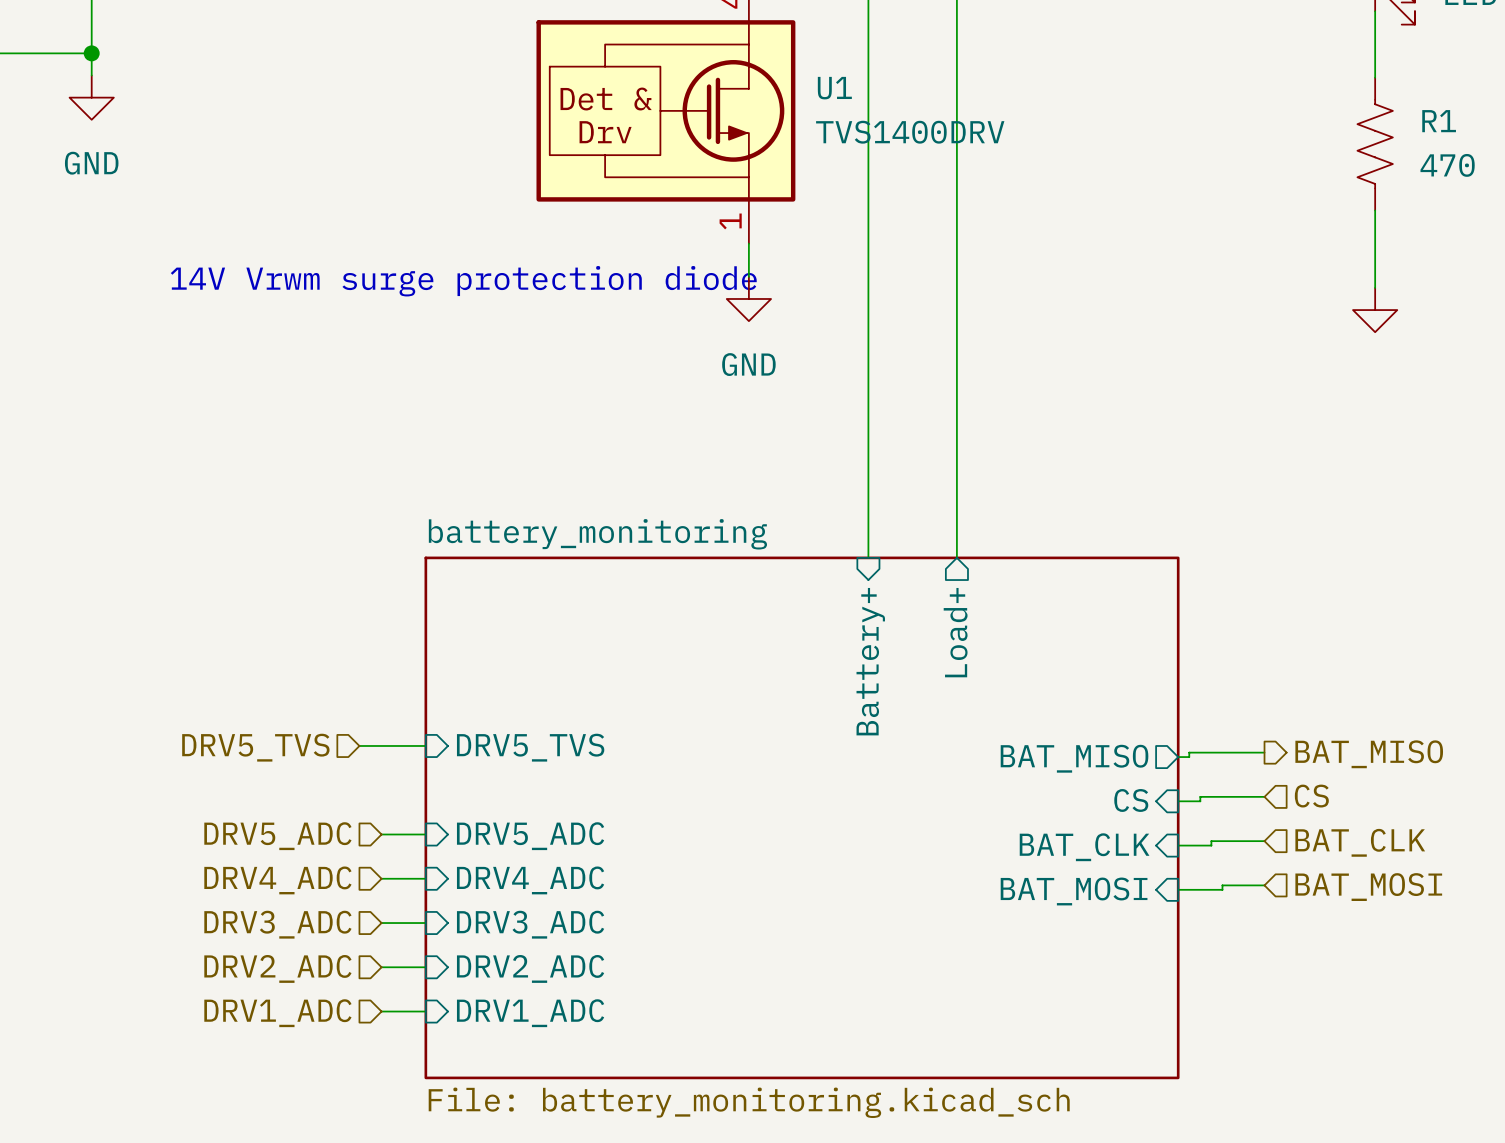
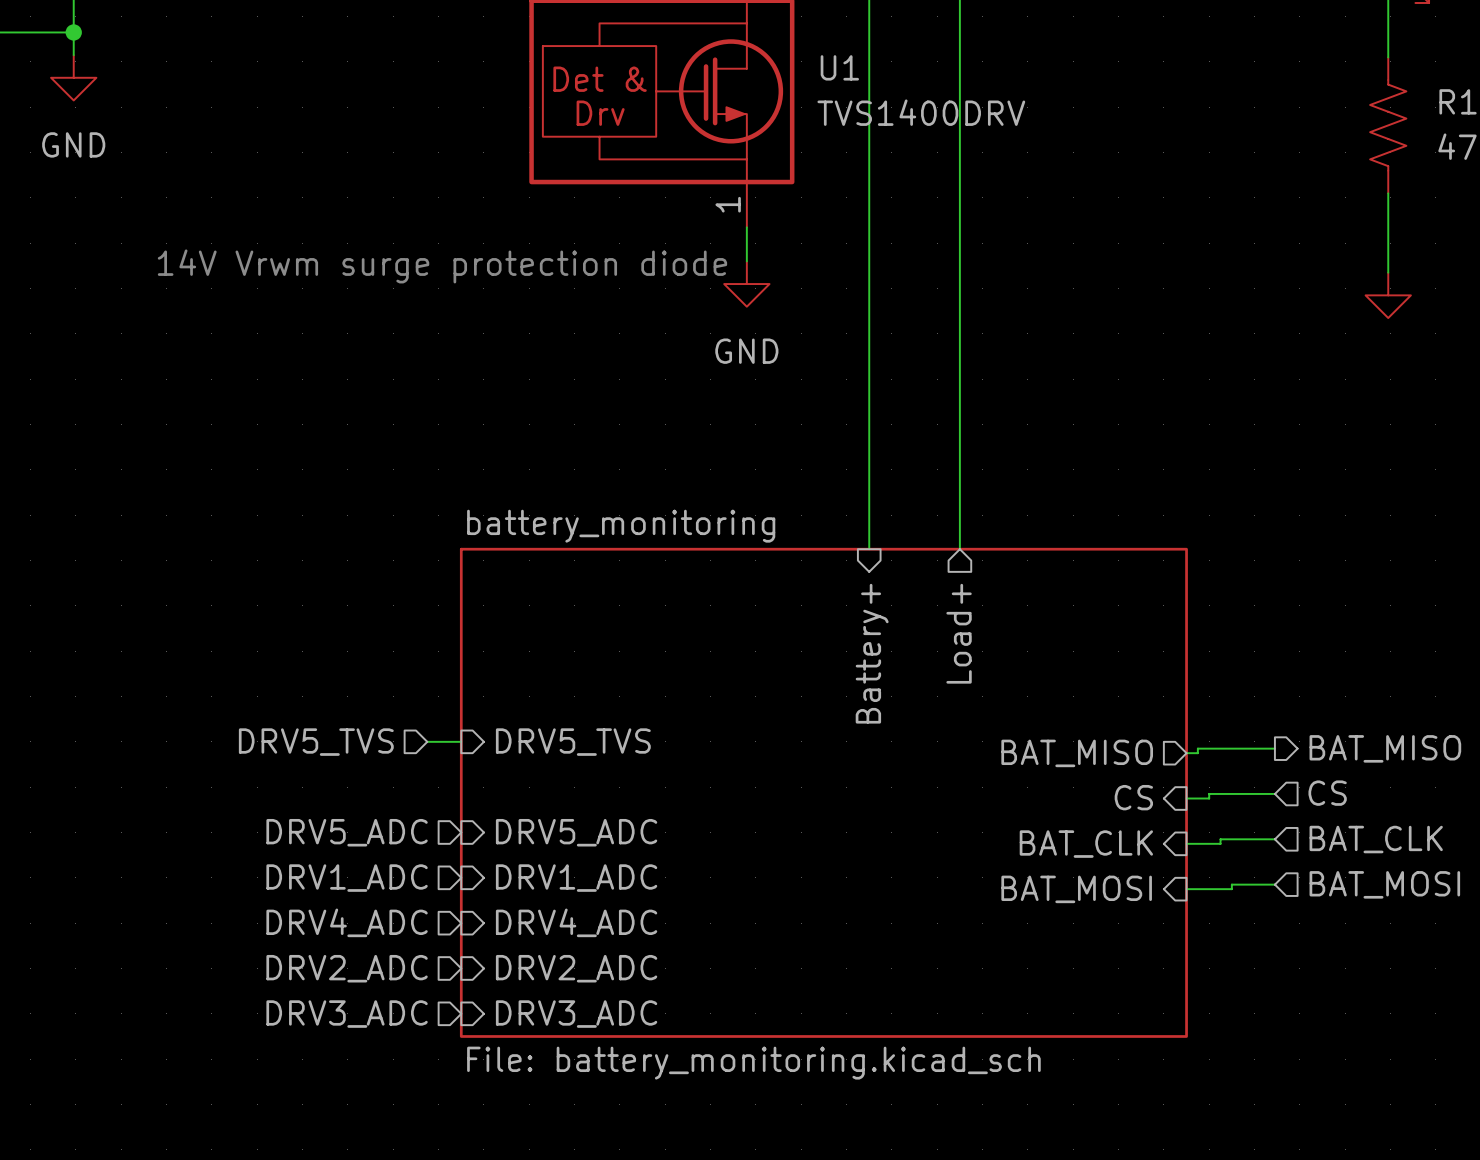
wire: (359, 745) (425, 745) -> none
wire: none -> (427, 741) (461, 741)
hierarchical label position: DRV5_TVS (255, 747) -> DRV5_TVS (316, 742)
sheet pin position: DRV5_TVS (530, 747) -> DRV5_TVS (573, 742)
sheet battery_monitoring: none -> File: battery_monitoring.kicad_sch (823, 792)
sheet battery_monitoring: File: battery_monitoring.kicad_sch (802, 817) -> none
wire: (381, 834) (425, 834) -> none
hierarchical label position: DRV5_ADC (277, 836) -> DRV5_ADC (347, 832)
sheet pin position: DRV5_ADC (530, 836) -> DRV5_ADC (576, 832)
wire: (381, 878) (425, 878) -> none
hierarchical label position: DRV4_ADC (277, 880) -> DRV4_ADC (347, 922)
sheet pin position: DRV4_ADC (530, 880) -> DRV4_ADC (576, 922)
wire: (381, 923) (425, 923) -> none
hierarchical label position: DRV3_ADC (277, 924) -> DRV3_ADC (347, 1014)
sheet pin position: DRV3_ADC (530, 924) -> DRV3_ADC (576, 1014)
wire: (381, 967) (425, 967) -> none
hierarchical label position: DRV2_ADC (277, 968) -> DRV2_ADC (347, 968)
sheet pin position: DRV2_ADC (530, 968) -> DRV2_ADC (576, 968)
wire: (381, 1011) (425, 1011) -> none
hierarchical label position: DRV1_ADC (277, 1013) -> DRV1_ADC (347, 878)
sheet pin position: DRV1_ADC (530, 1013) -> DRV1_ADC (576, 878)

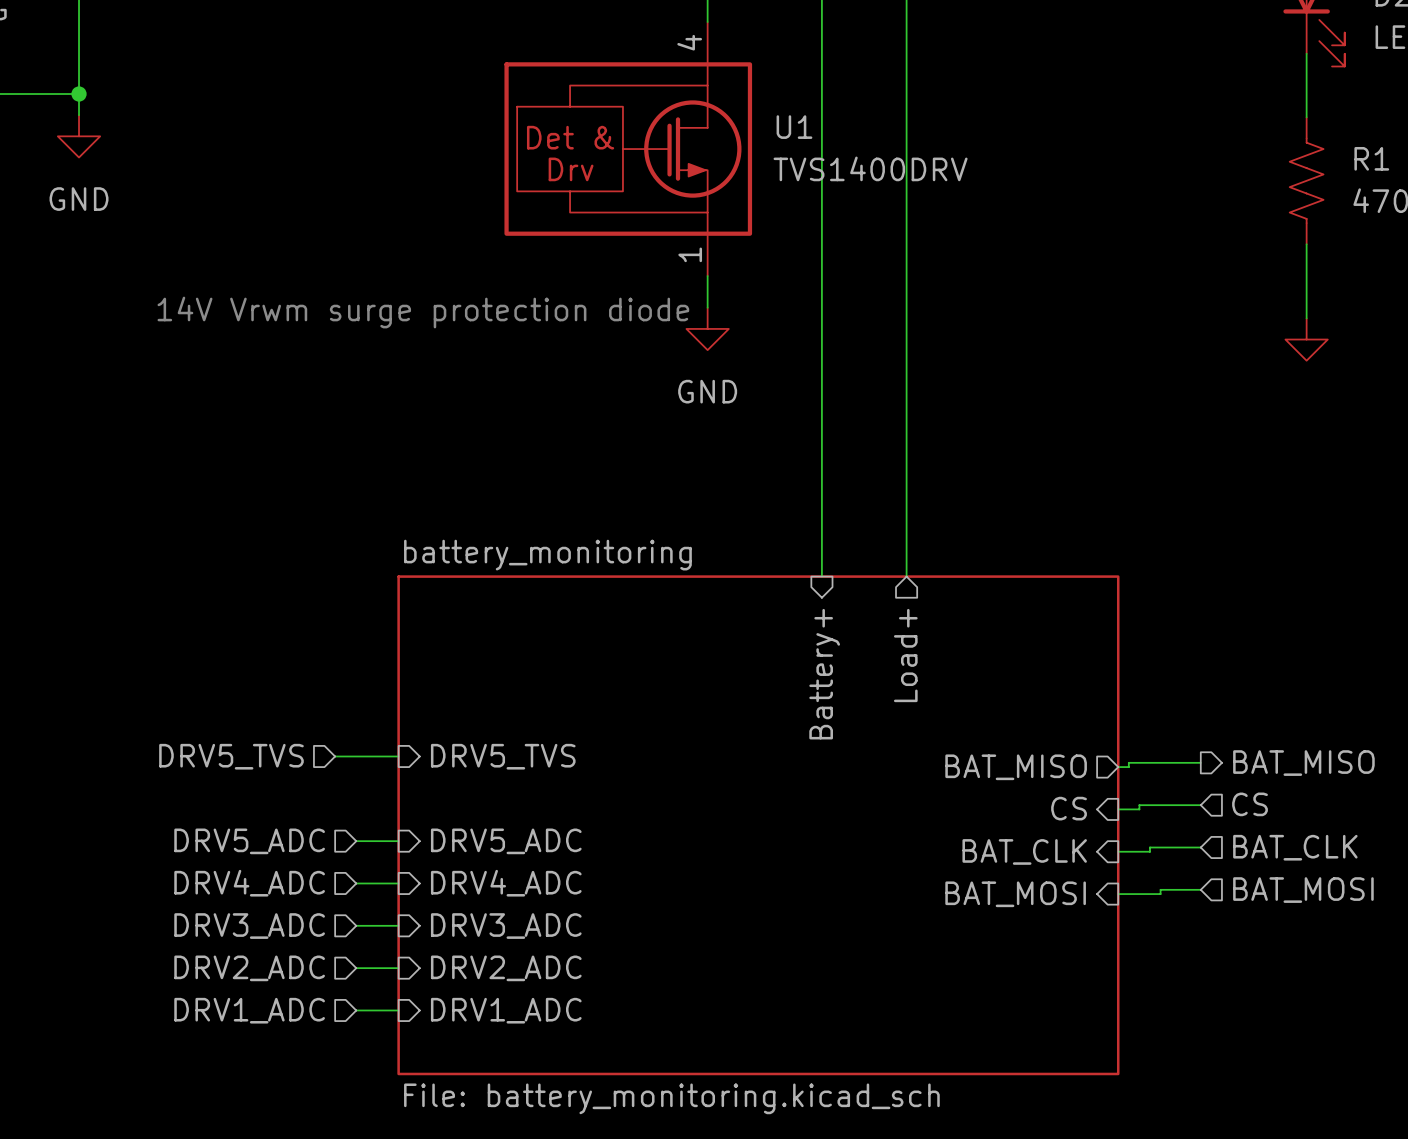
wire: none -> (335, 756) (398, 756)
wire: (427, 741) (461, 741) -> none
hierarchical label position: DRV5_TVS (316, 742) -> DRV5_TVS (231, 756)
sheet pin position: DRV5_TVS (573, 742) -> DRV5_TVS (503, 756)
sheet battery_monitoring: File: battery_monitoring.kicad_sch (823, 792) -> none
sheet battery_monitoring: none -> File: battery_monitoring.kicad_sch (758, 825)
hierarchical label position: DRV5_ADC (347, 832) -> DRV5_ADC (249, 841)
wire: none -> (356, 841) (398, 841)
sheet pin position: DRV5_ADC (576, 832) -> DRV5_ADC (506, 841)
wire: none -> (356, 883) (398, 883)
hierarchical label position: DRV1_ADC (347, 878) -> DRV1_ADC (249, 1010)
sheet pin position: DRV1_ADC (576, 878) -> DRV1_ADC (506, 1010)
hierarchical label position: DRV4_ADC (347, 922) -> DRV4_ADC (249, 883)
sheet pin position: DRV4_ADC (576, 922) -> DRV4_ADC (506, 883)
wire: none -> (356, 925) (398, 925)
hierarchical label position: DRV2_ADC (347, 968) -> DRV2_ADC (249, 968)
wire: none -> (356, 968) (398, 968)
sheet pin position: DRV2_ADC (576, 968) -> DRV2_ADC (506, 968)
wire: none -> (356, 1010) (398, 1010)
hierarchical label position: DRV3_ADC (347, 1014) -> DRV3_ADC (249, 926)
sheet pin position: DRV3_ADC (576, 1014) -> DRV3_ADC (506, 926)

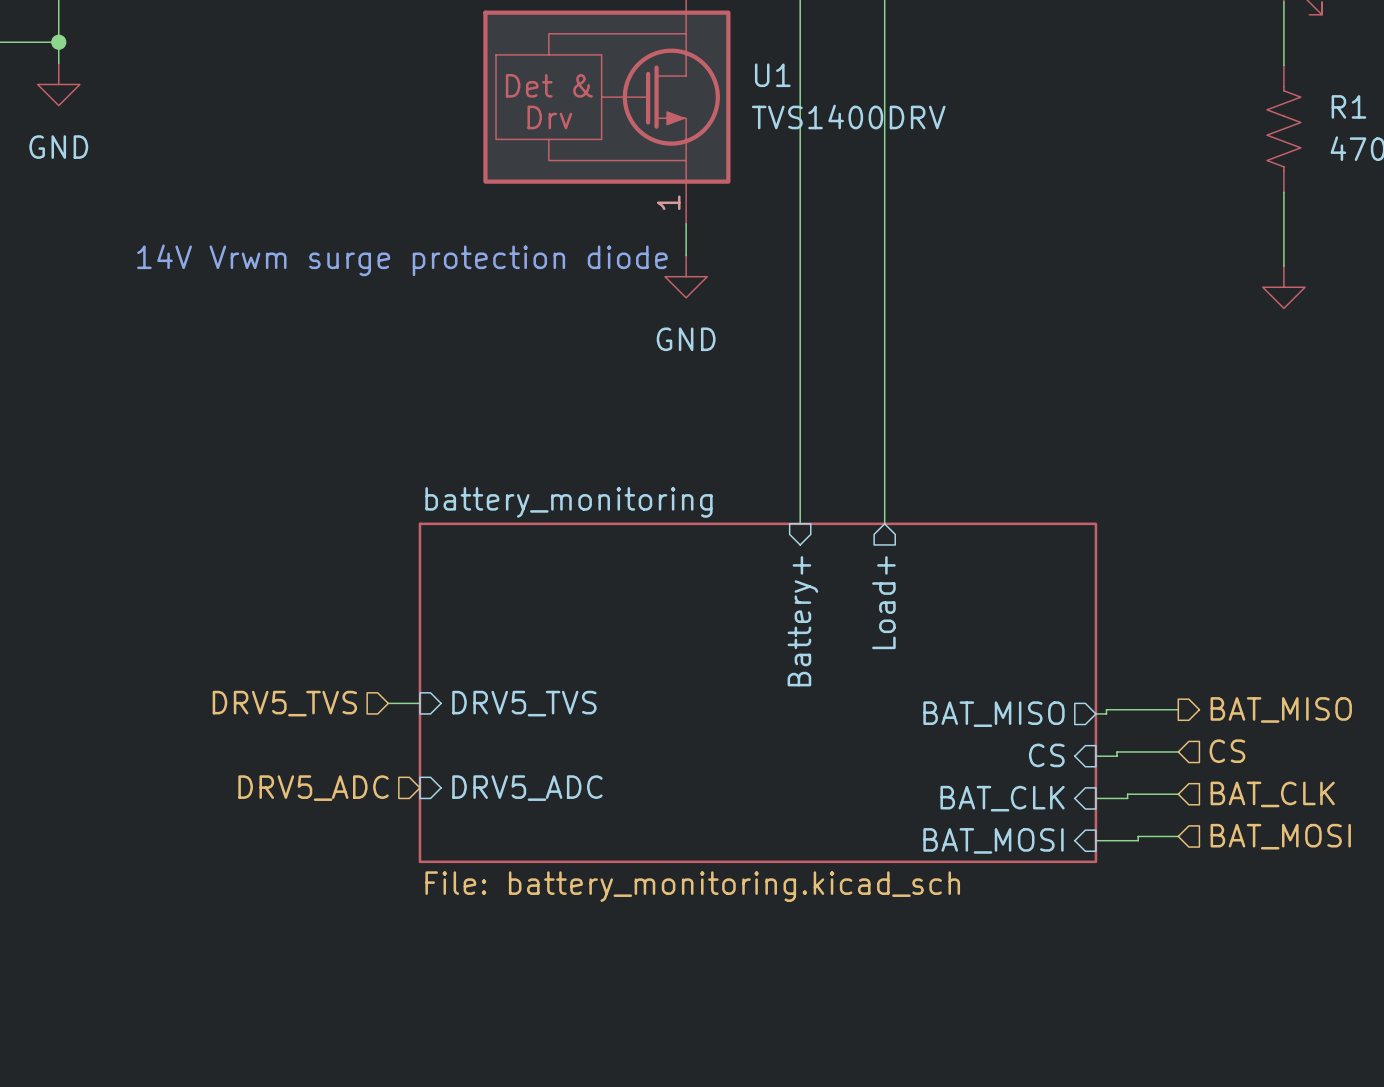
sheet battery_monitoring: none -> File: battery_monitoring.kicad_sch (757, 692)
hierarchical label position: DRV5_TVS (231, 756) -> DRV5_TVS (284, 703)
wire: (335, 756) (398, 756) -> none
wire: none -> (388, 703) (419, 703)
sheet pin position: DRV5_TVS (503, 756) -> DRV5_TVS (524, 703)
sheet battery_monitoring: File: battery_monitoring.kicad_sch (758, 825) -> none
hierarchical label position: DRV5_ADC (249, 841) -> DRV5_ADC (313, 788)
wire: (356, 841) (398, 841) -> none
sheet pin position: DRV5_ADC (506, 841) -> DRV5_ADC (527, 788)
hierarchical label: DRV4_ADC (249, 883) -> none
wire: (356, 883) (398, 883) -> none
sheet pin: DRV4_ADC (506, 883) -> none
wire: (356, 925) (398, 925) -> none
hierarchical label: DRV3_ADC (249, 926) -> none
sheet pin: DRV3_ADC (506, 926) -> none
hierarchical label: DRV2_ADC (249, 968) -> none
wire: (356, 968) (398, 968) -> none
sheet pin: DRV2_ADC (506, 968) -> none
hierarchical label: DRV1_ADC (249, 1010) -> none
wire: (356, 1010) (398, 1010) -> none
sheet pin: DRV1_ADC (506, 1010) -> none

